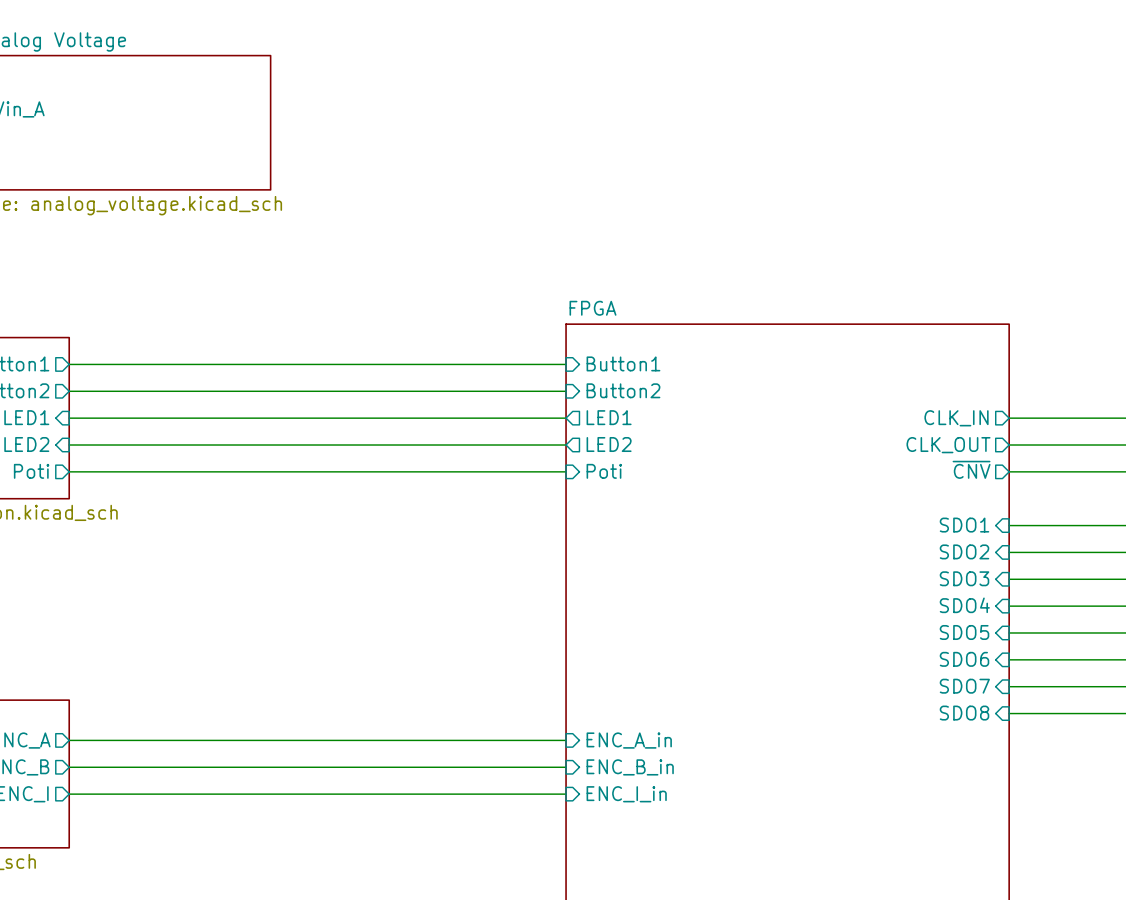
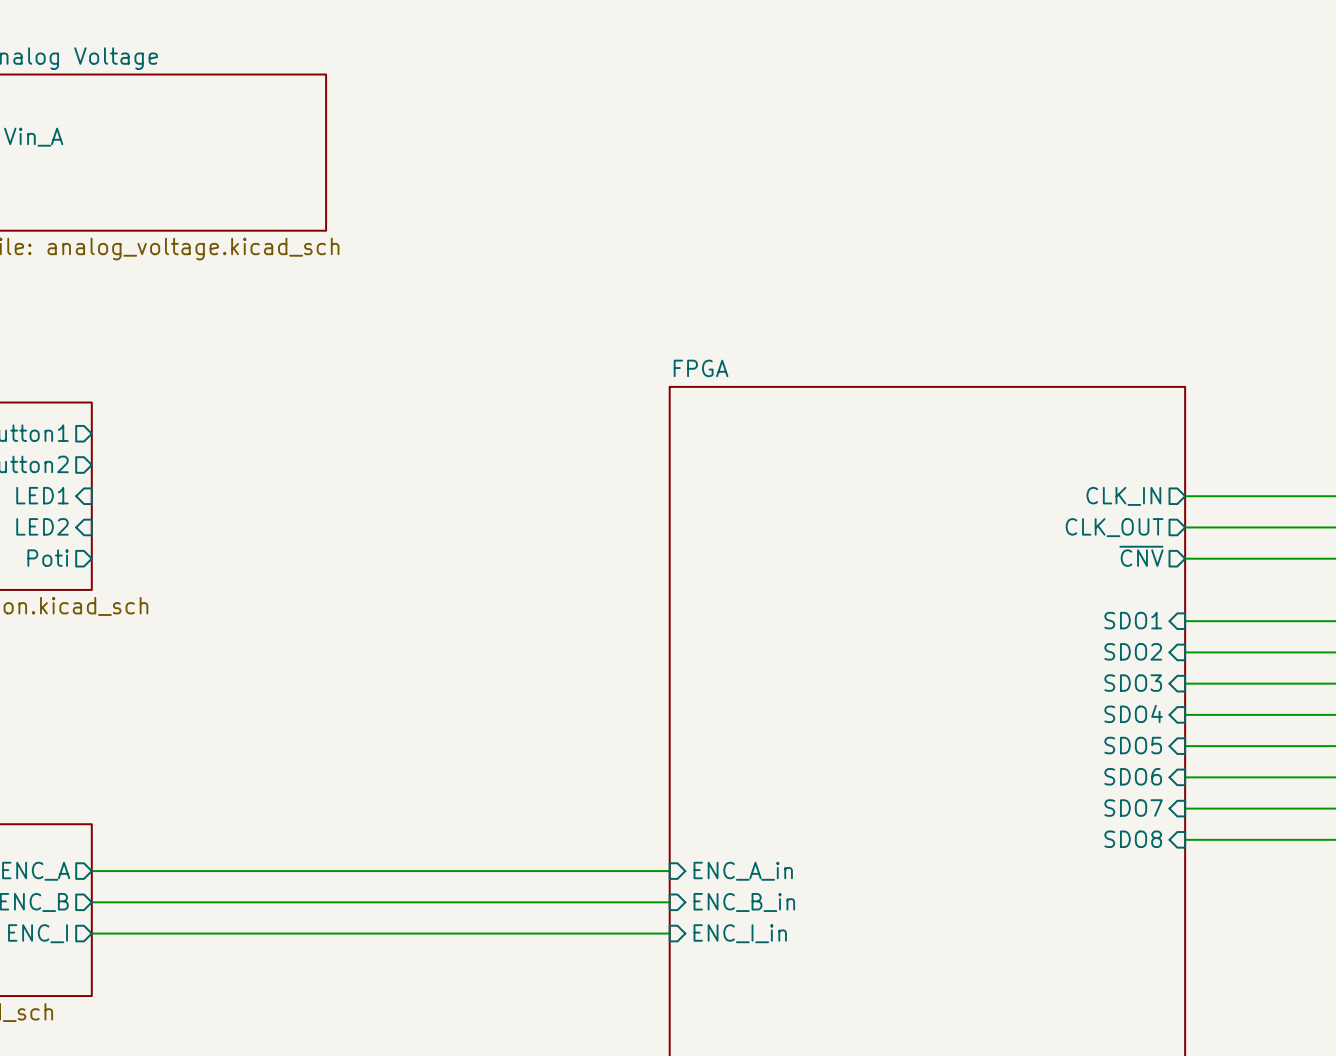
sheet pin: Button1 (623, 363) -> none
wire: (69, 364) (566, 364) -> none
sheet pin: Button2 (623, 390) -> none
wire: (69, 391) (566, 391) -> none
sheet pin: LED1 (609, 417) -> none
wire: (69, 418) (566, 418) -> none
sheet pin: LED2 (609, 444) -> none
wire: (69, 445) (566, 445) -> none
wire: (69, 471) (566, 471) -> none
sheet pin: Poti (604, 471) -> none

